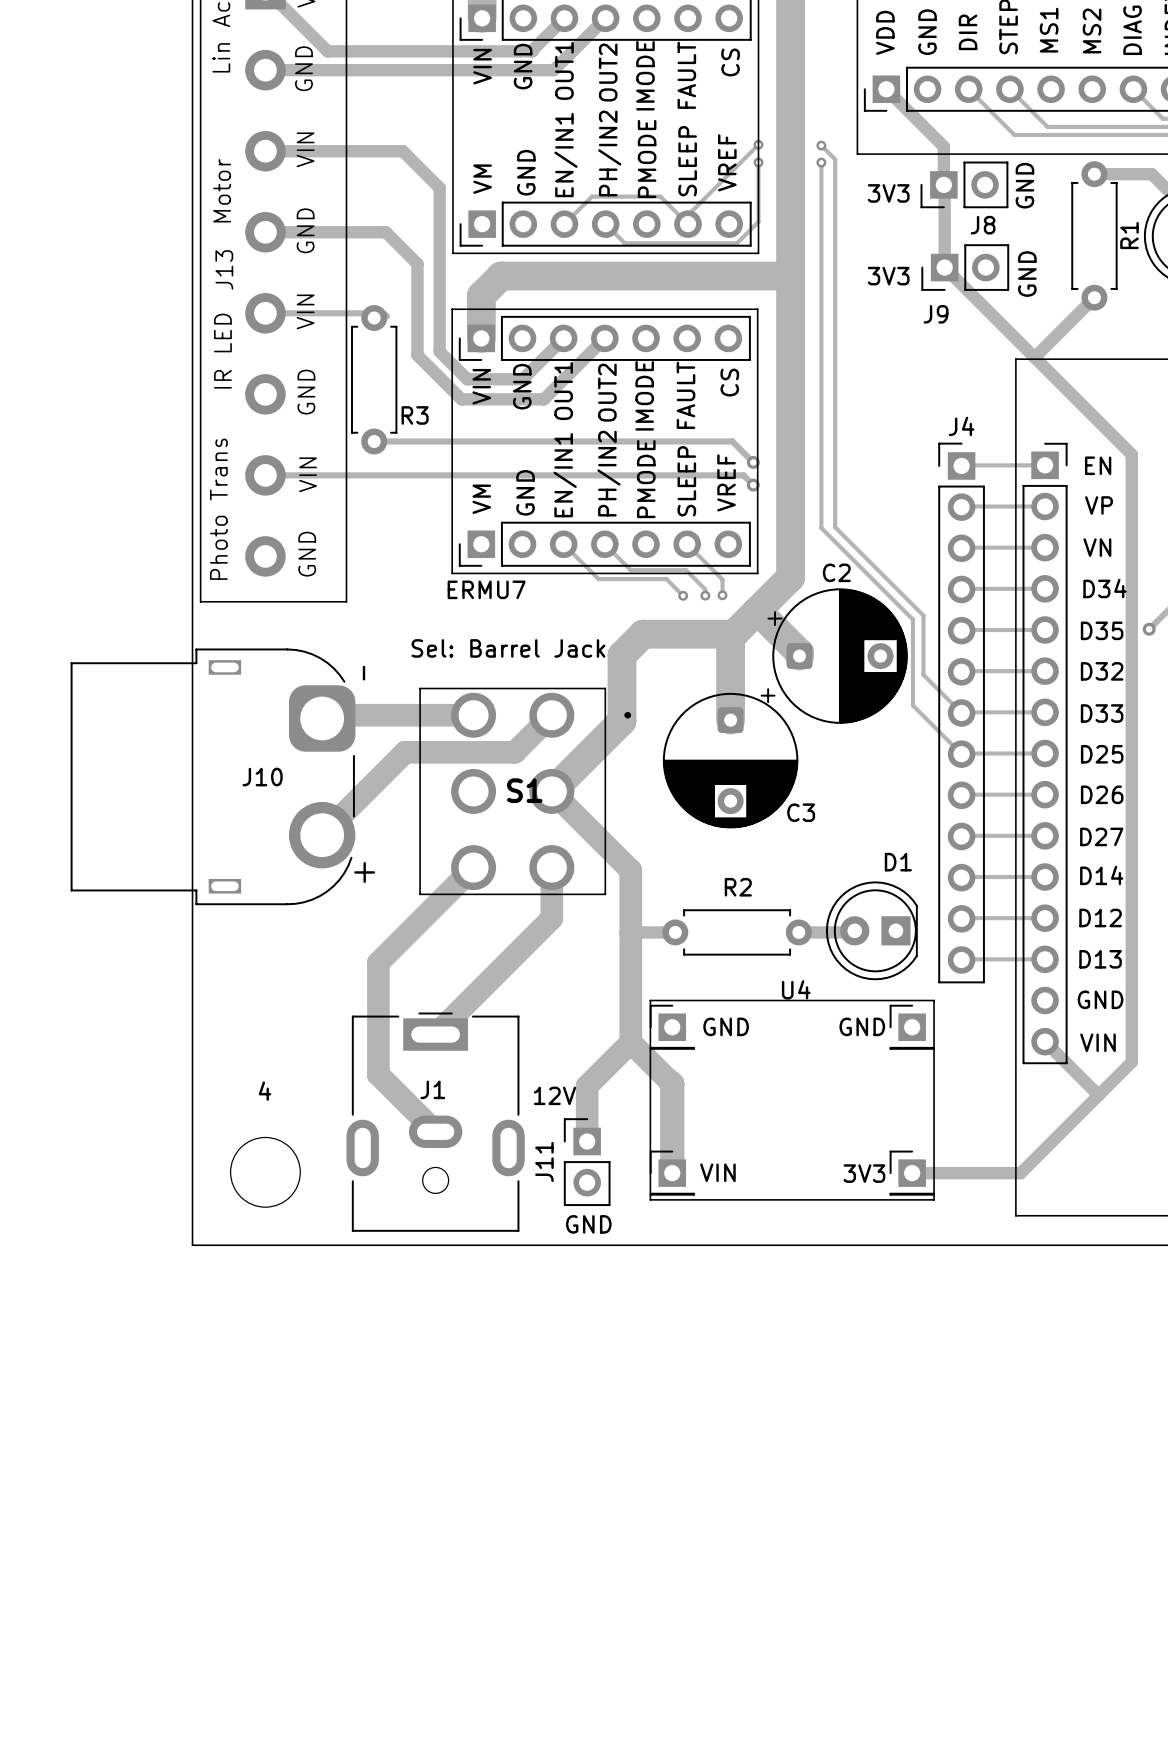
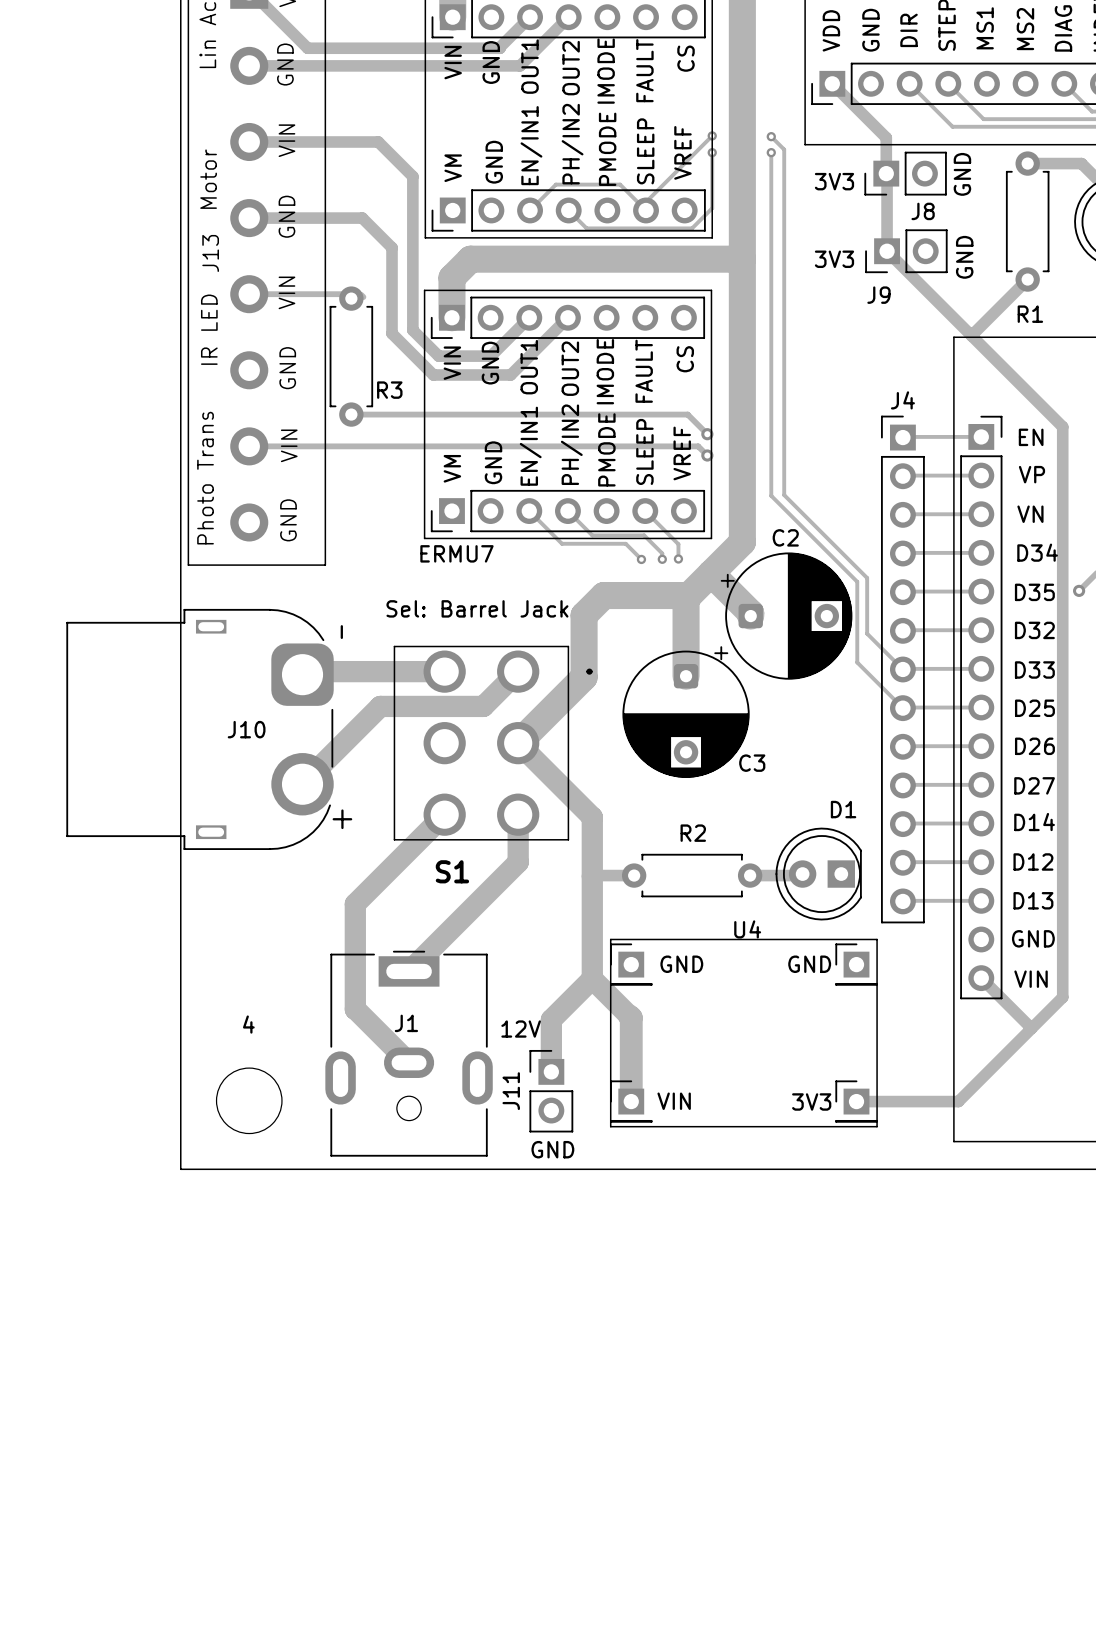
R1 name rotation: 0° (1129, 235) -> 90° clockwise (1030, 314)
R1 name position: R1 (1129, 235) -> R1 (1030, 314)
S1 name position: S1 (524, 790) -> S1 (452, 871)

